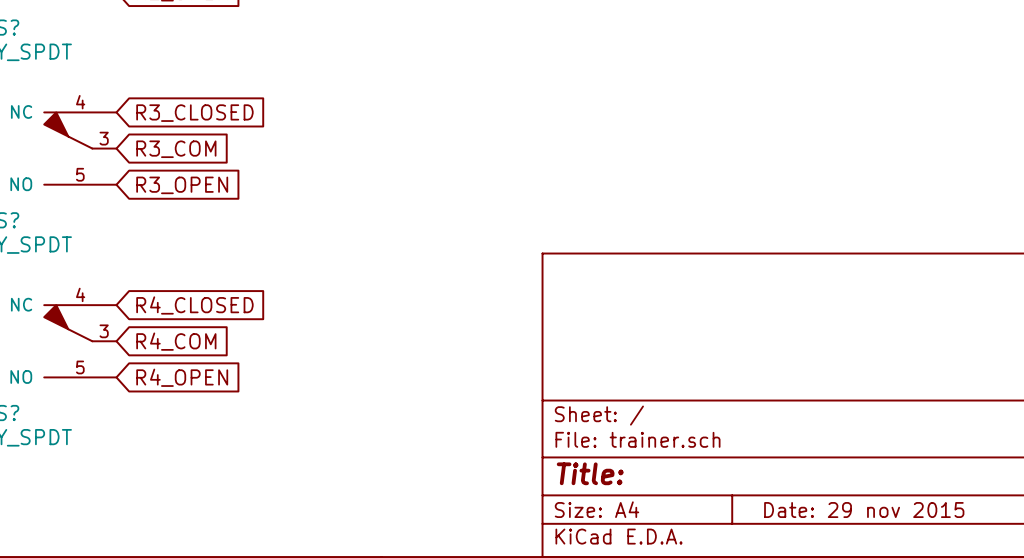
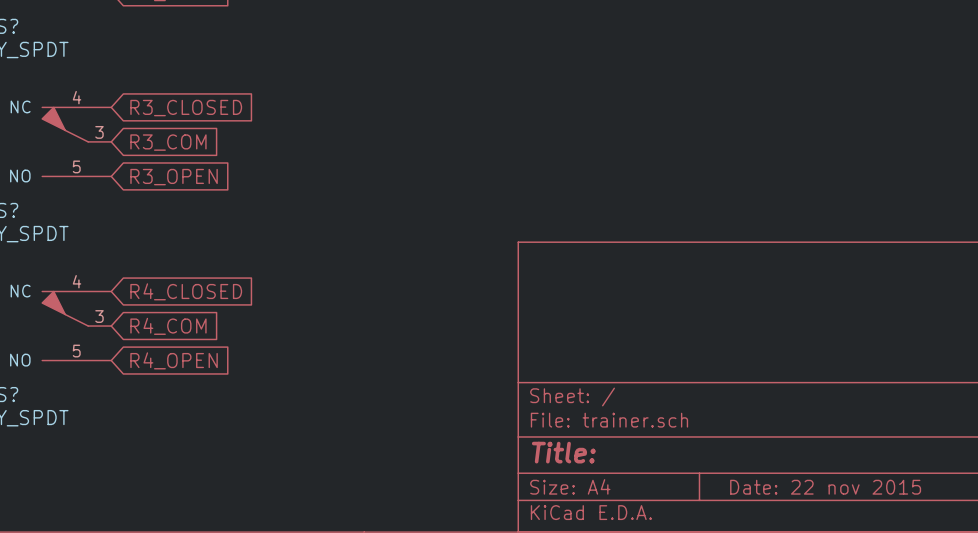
title block: Date: 29 nov 2015 (864, 510) -> Date: 22 nov 2015 (825, 487)

